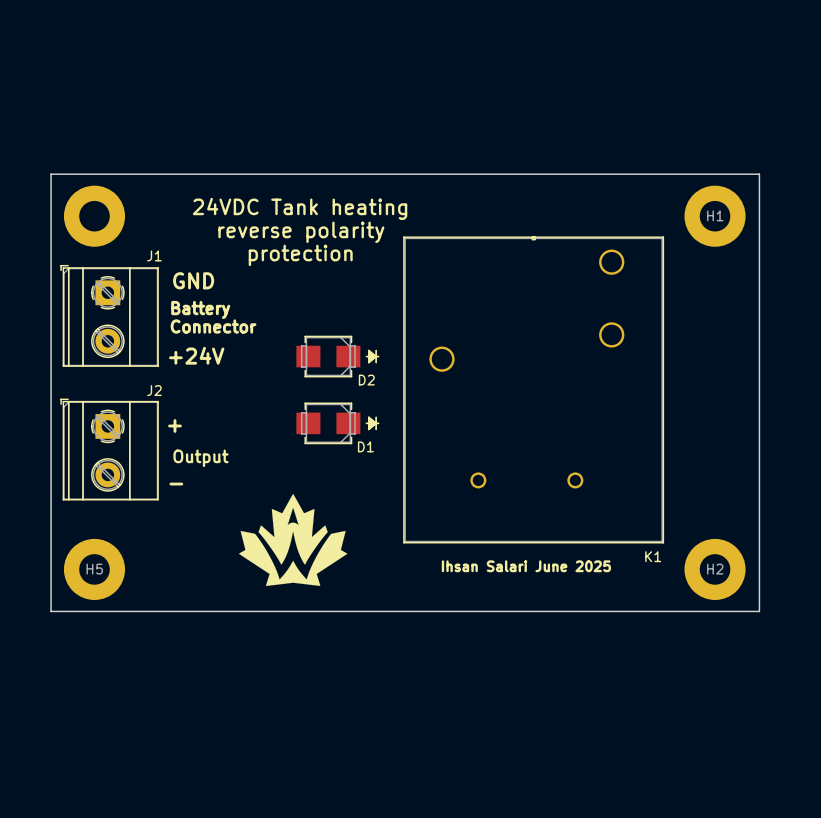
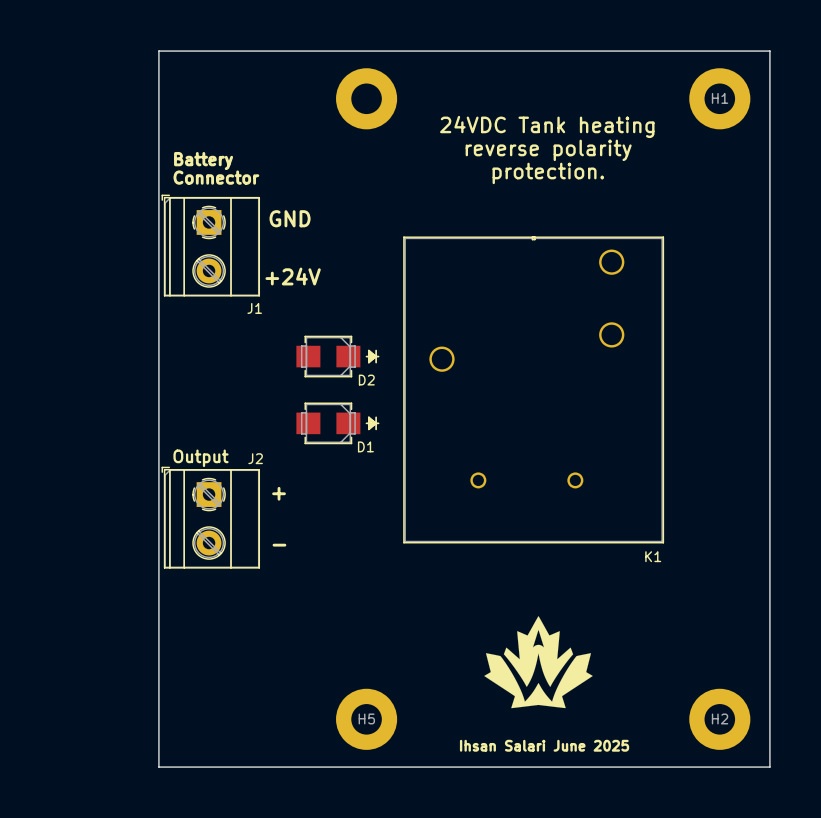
part: none -> (366, 98)
text: none -> 24VDC Tank heating (547, 126)
text: none -> reverse polarity (548, 150)
text: none -> protection. (548, 173)
board edge: (51, 174) (759, 174) (759, 611) (51, 611) (51, 174) -> (158, 51) (158, 767) (769, 767) (769, 51) (158, 51)
text: 24VDC Tank heating (300, 208) -> none
part: (94, 216) -> none
H1 position: (715, 216) -> (719, 98)
text: reverse polarity (301, 232) -> none
J1 name position: J1 (154, 255) -> J1 (254, 308)
text: protection (300, 255) -> none
text position: GND (193, 280) -> GND (290, 218)
text position: Battery (200, 309) -> Battery (203, 161)
J1 position: (109, 315) -> (210, 245)
text position: Connector (213, 326) -> Connector (216, 177)
text position: +24V (196, 355) -> +24V (293, 276)
text position: + (174, 425) -> + (279, 493)
J2 position: (109, 449) -> (210, 517)
text position: - (176, 484) -> - (279, 545)
drawing: [238, 493, 348, 586] -> none
text position: Ihsan Salari June 2025 (526, 566) -> Ihsan Salari June 2025 (544, 745)
H5 position: (94, 569) -> (366, 719)
H2 position: (715, 569) -> (719, 719)
drawing: none -> [484, 616, 593, 709]

